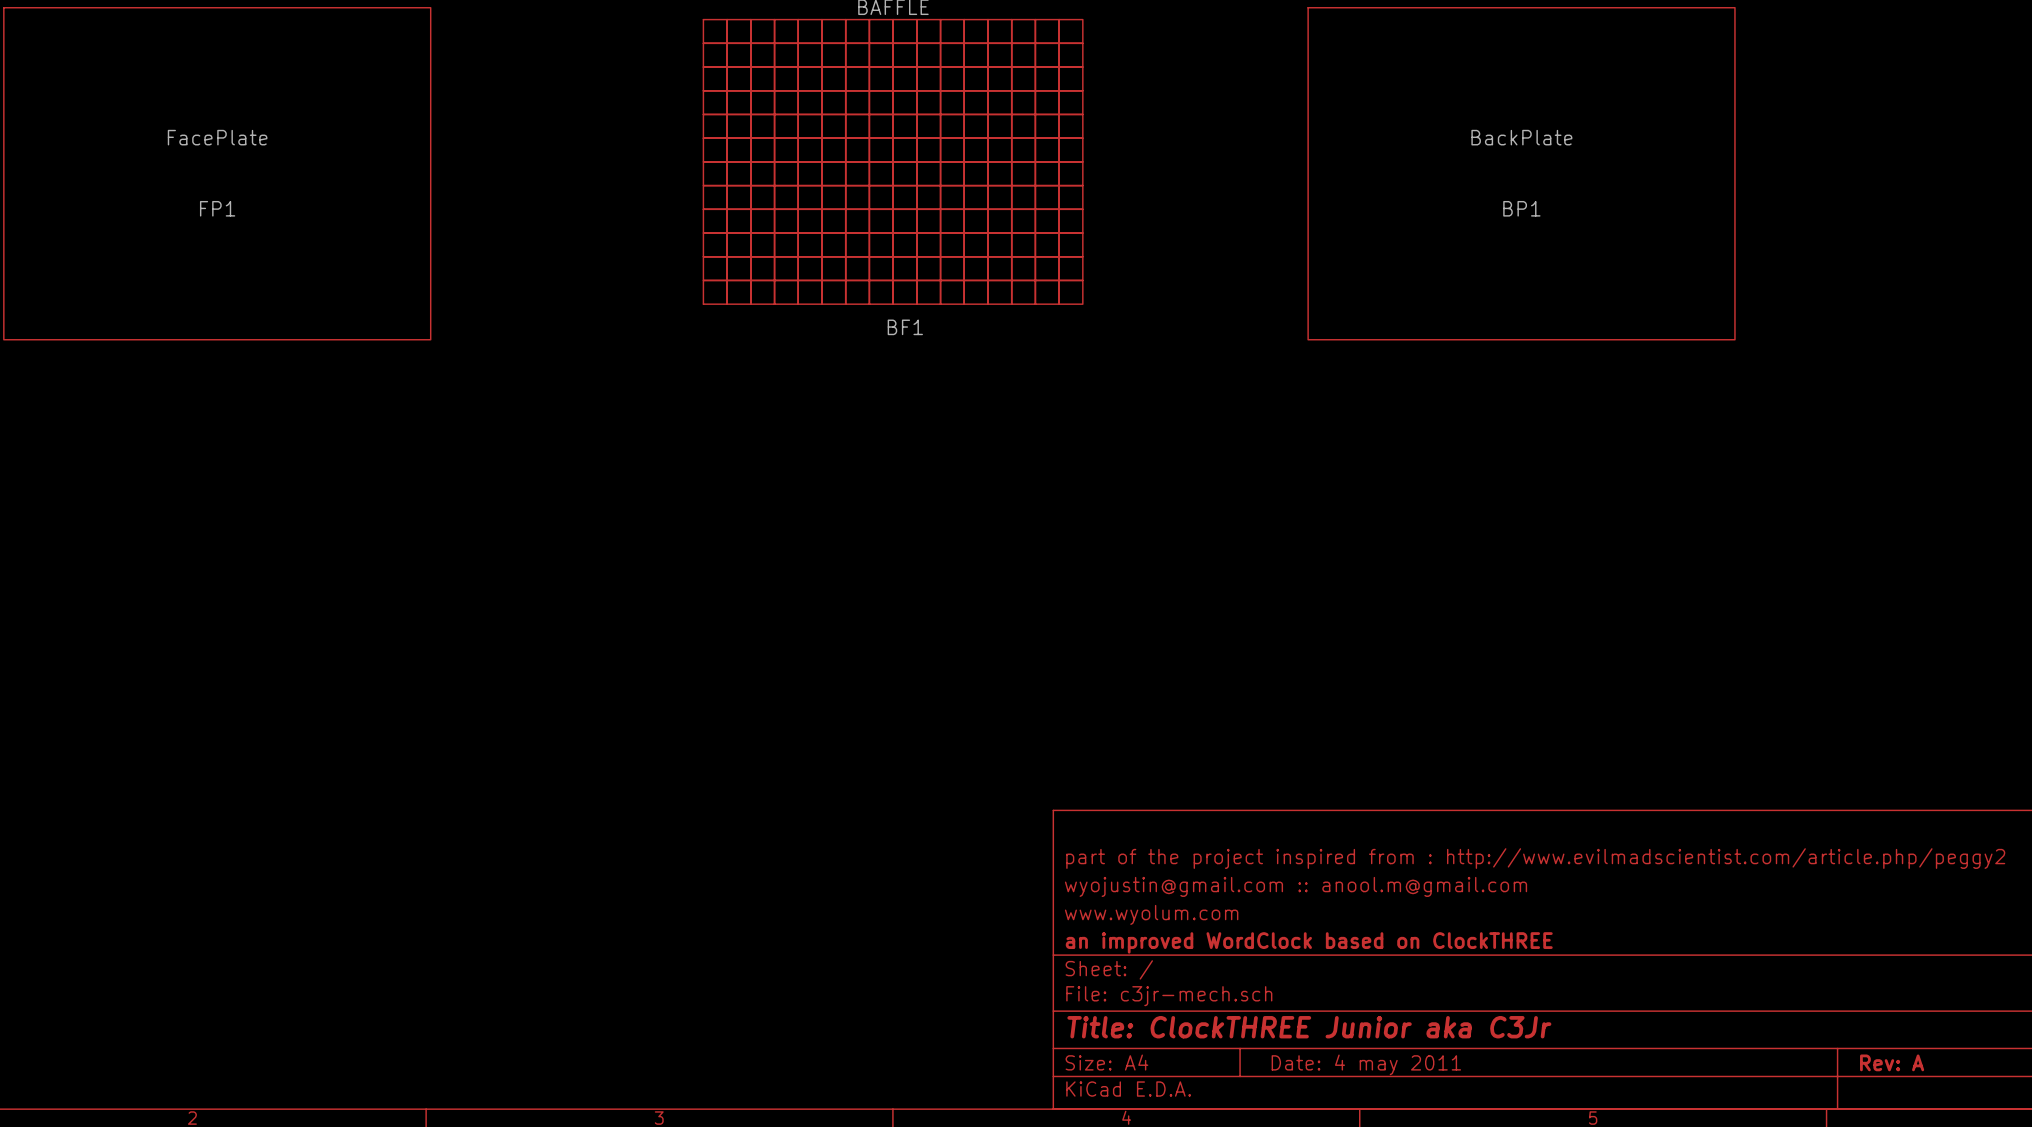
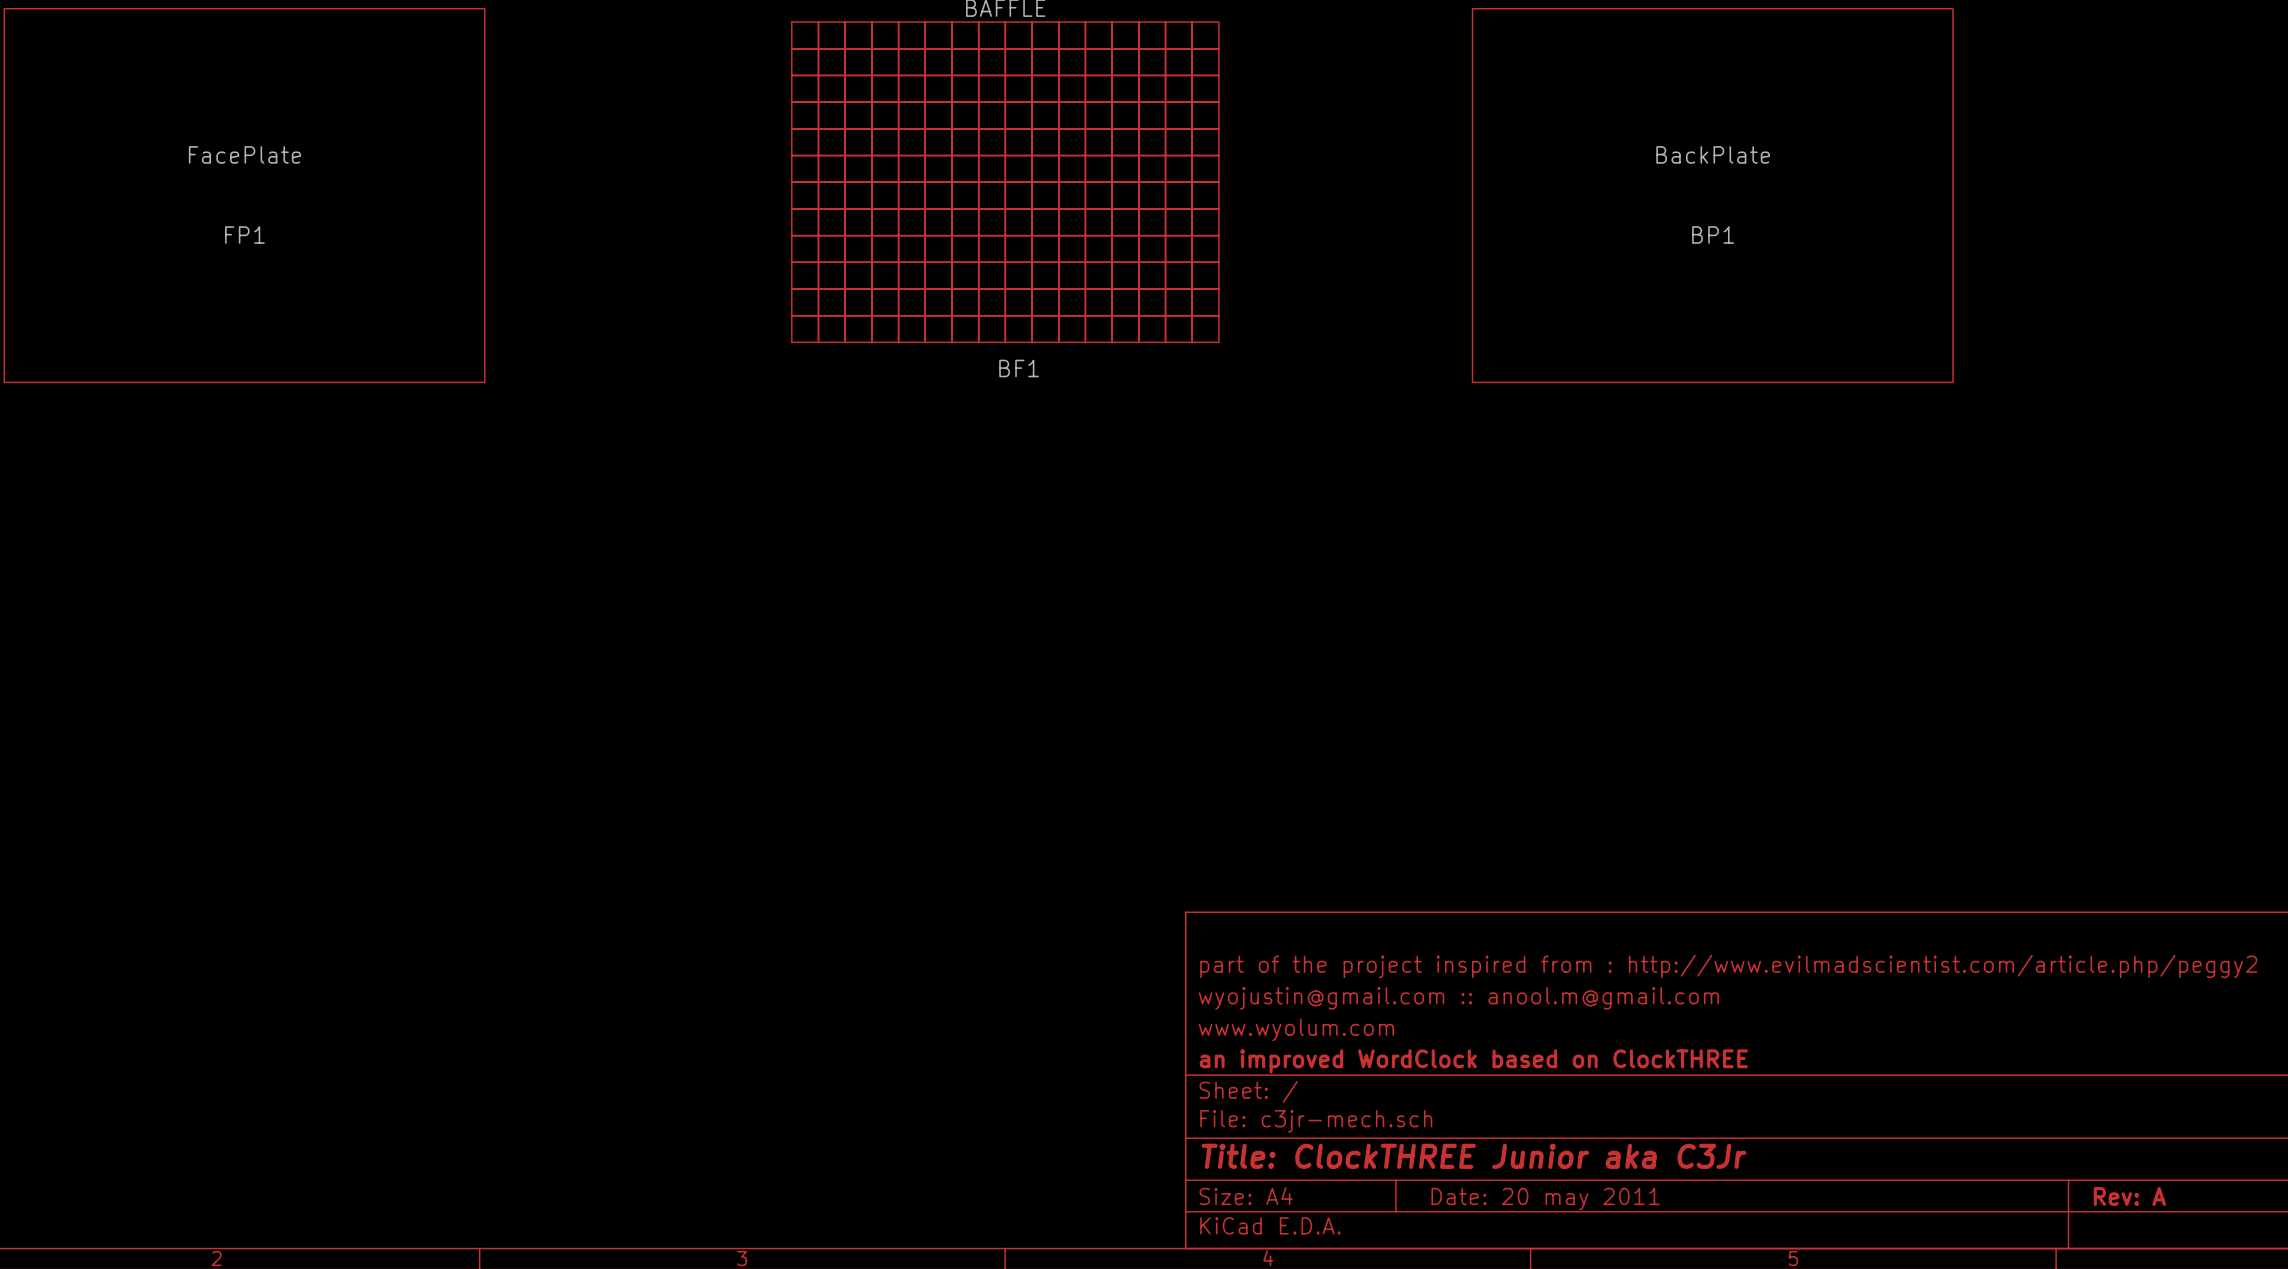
title block: Date: 4 may 2011 (1366, 1064) -> Date: 20 may 2011 (1545, 1199)

